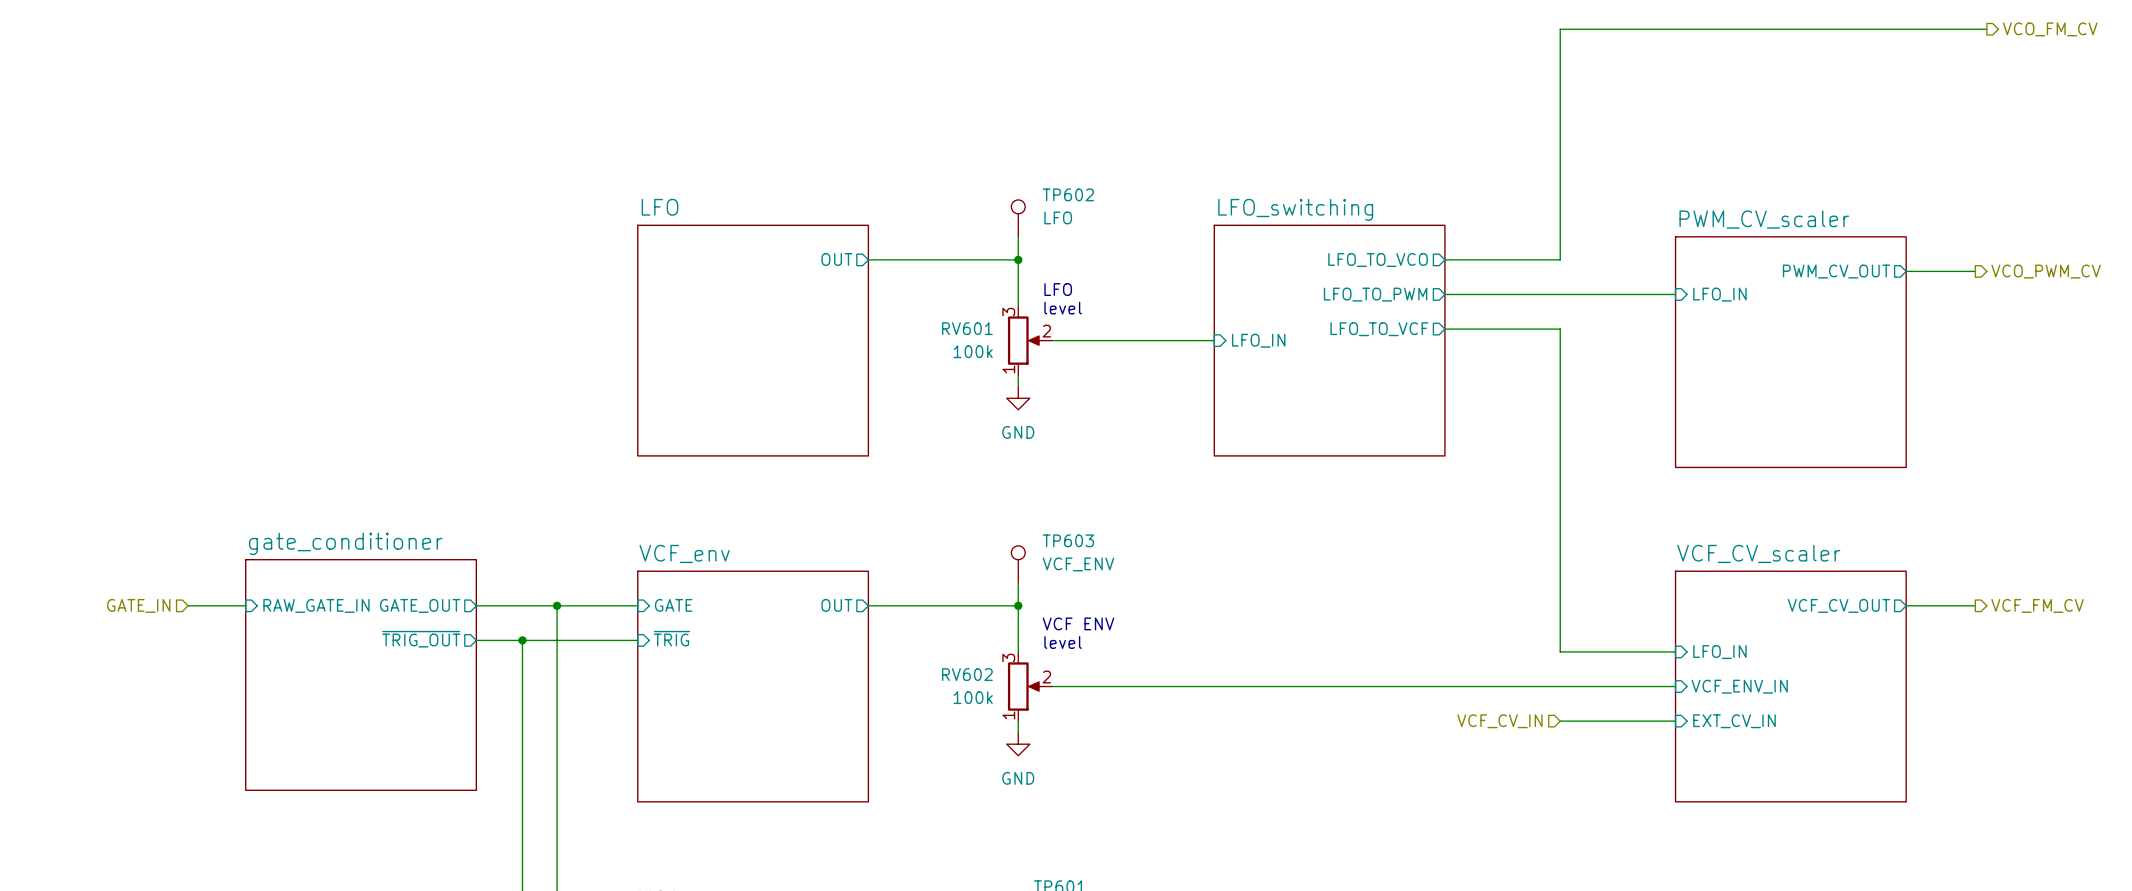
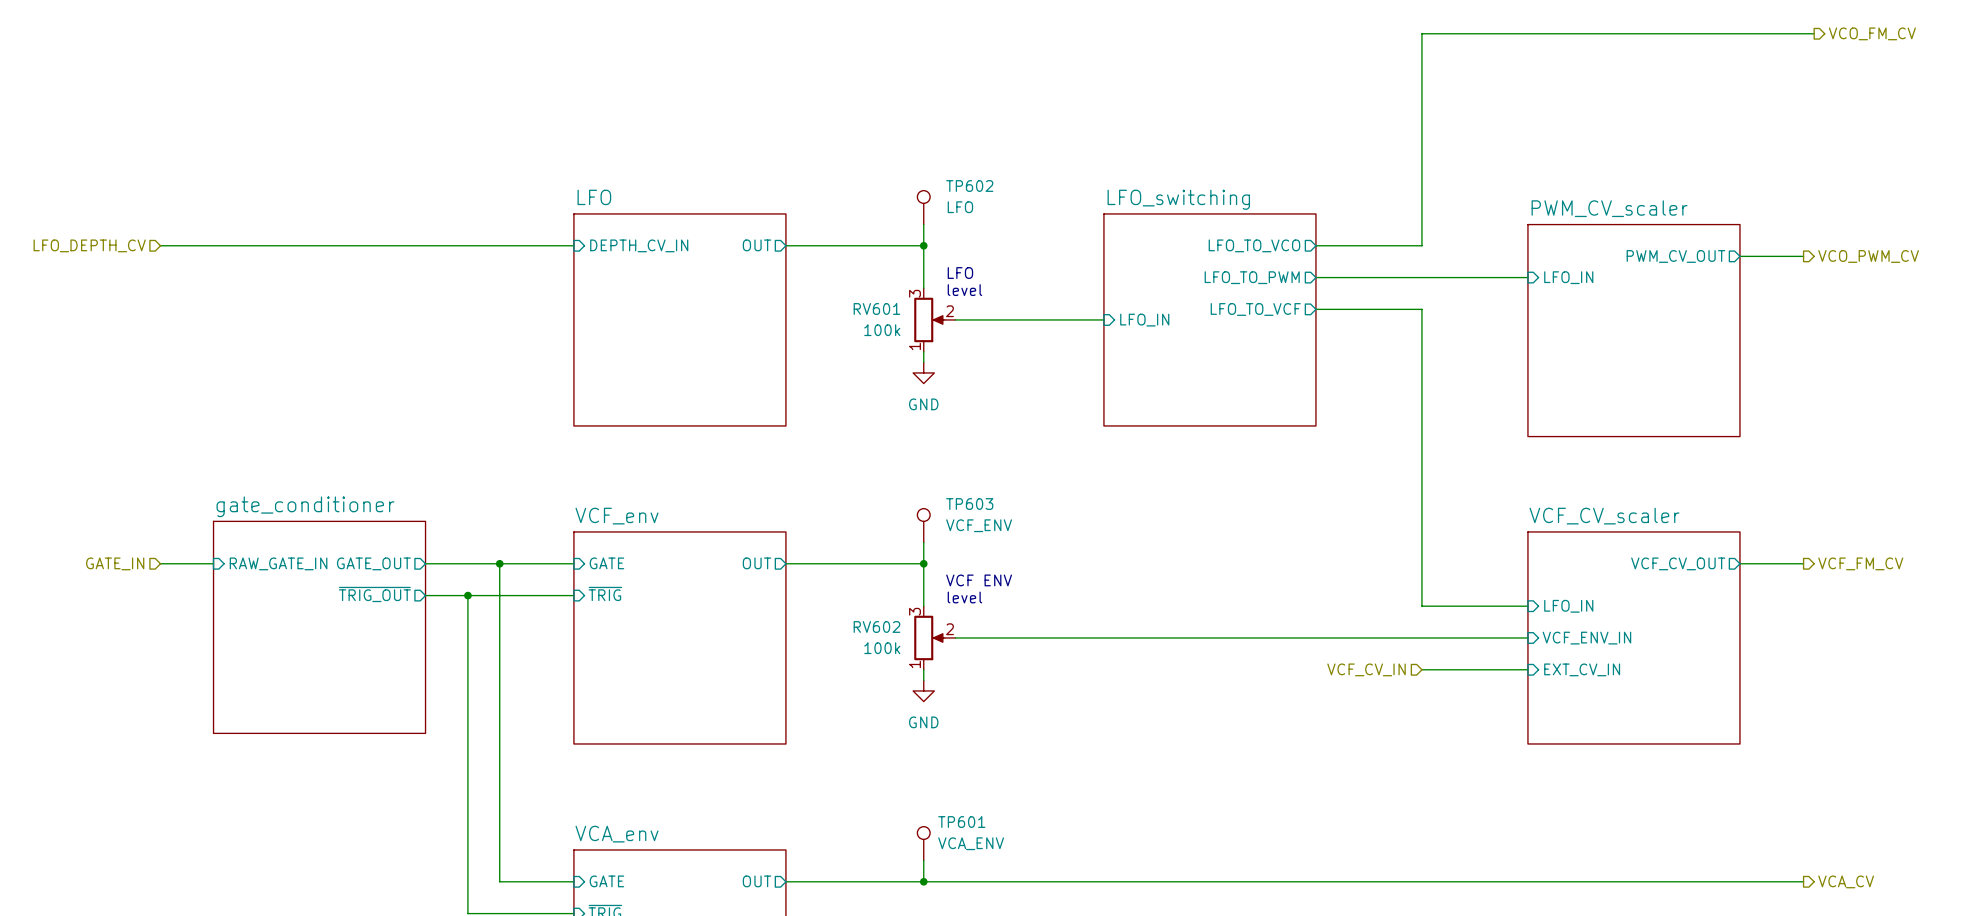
wire: none -> (160, 245) (573, 245)
hierarchical label: none -> LFO_DEPTH_CV (89, 245)
sheet pin: none -> DEPTH_CV_IN (639, 245)

